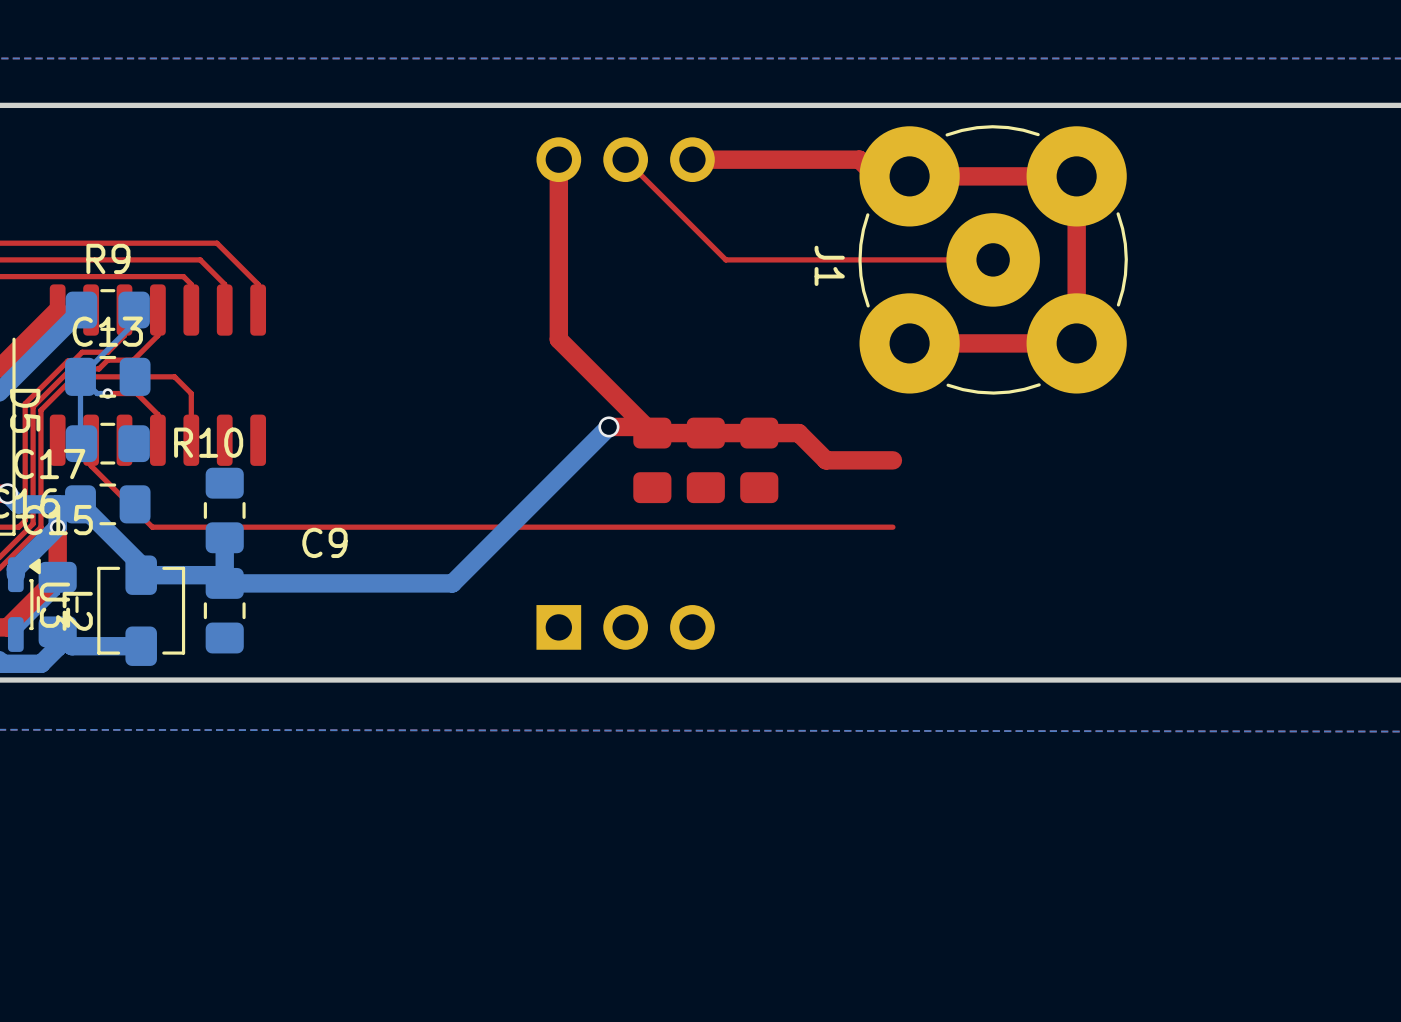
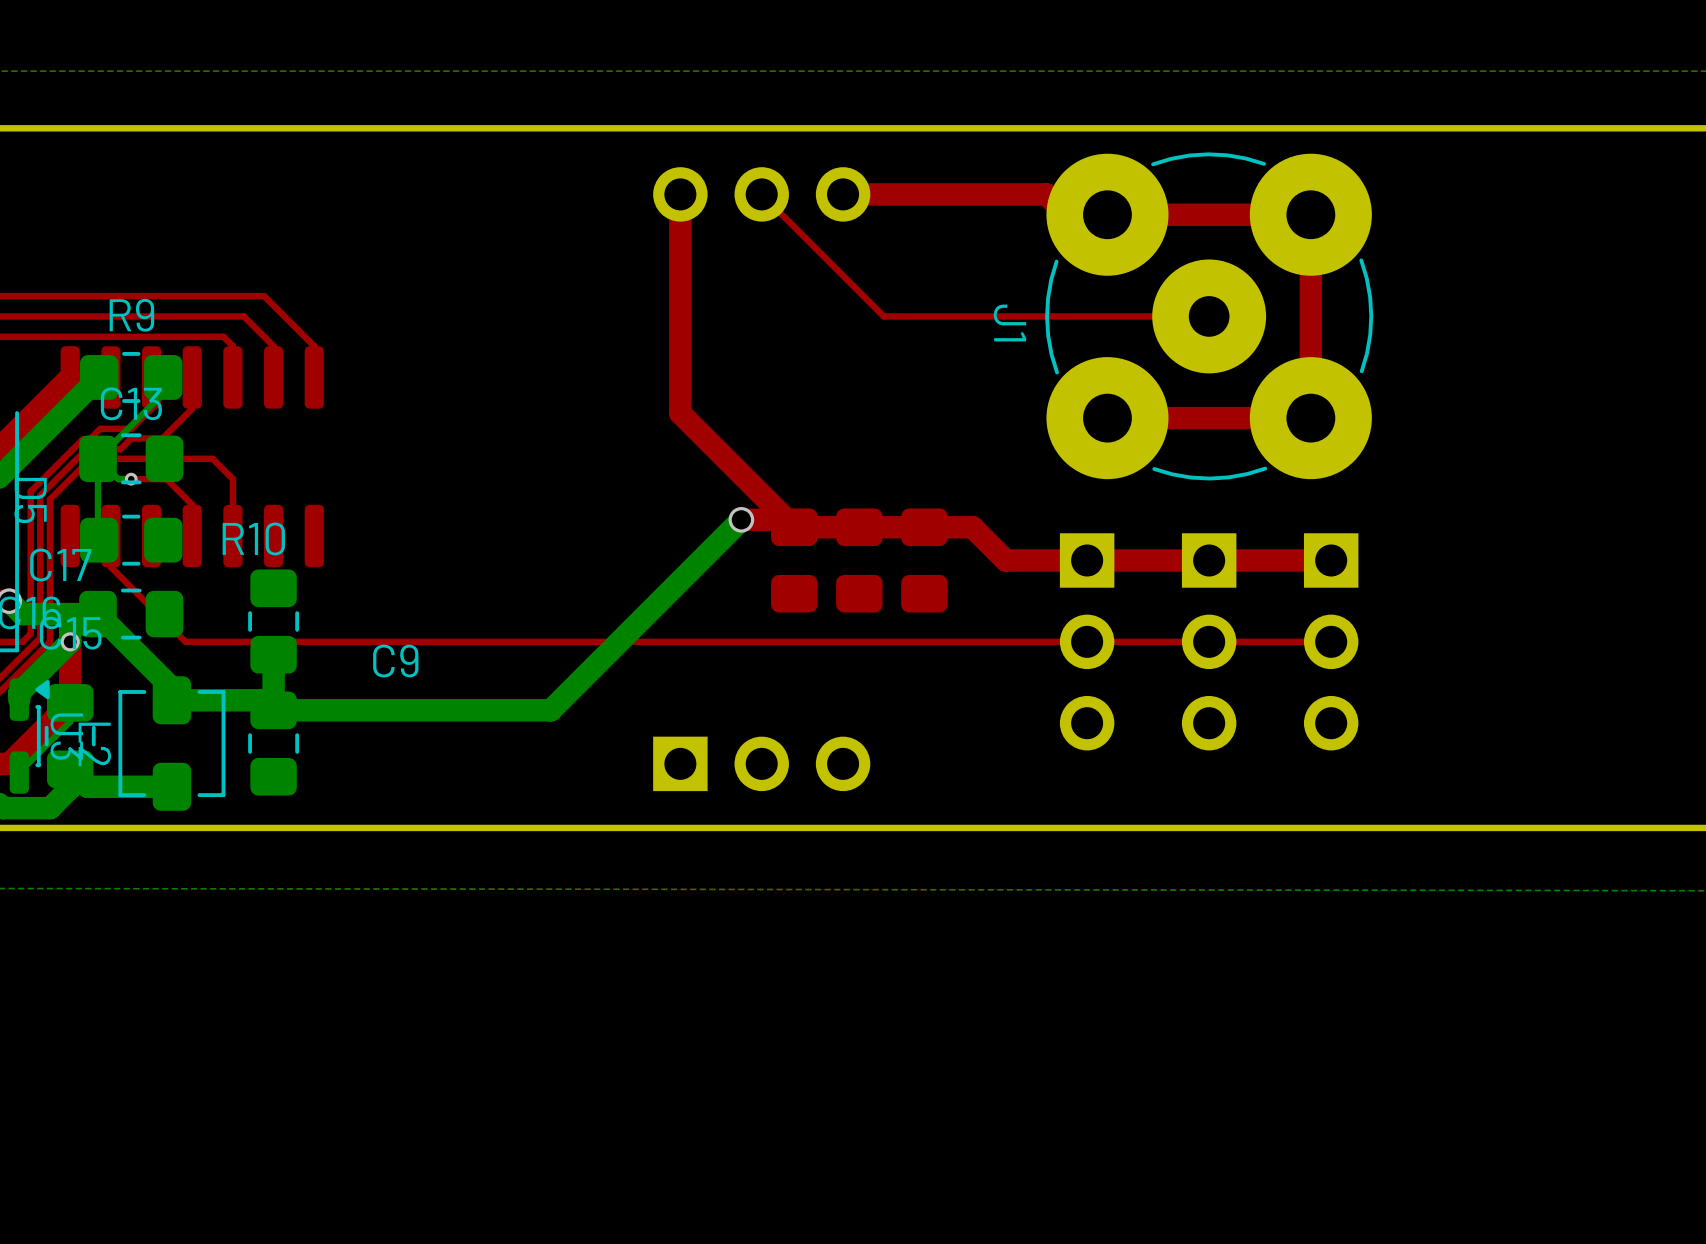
top track: none -> (1331, 560) (1087, 560)
part: none -> (1087, 641)
part: none -> (1209, 641)
top track: none -> (1331, 641) (1087, 641)
part: none -> (1331, 641)

